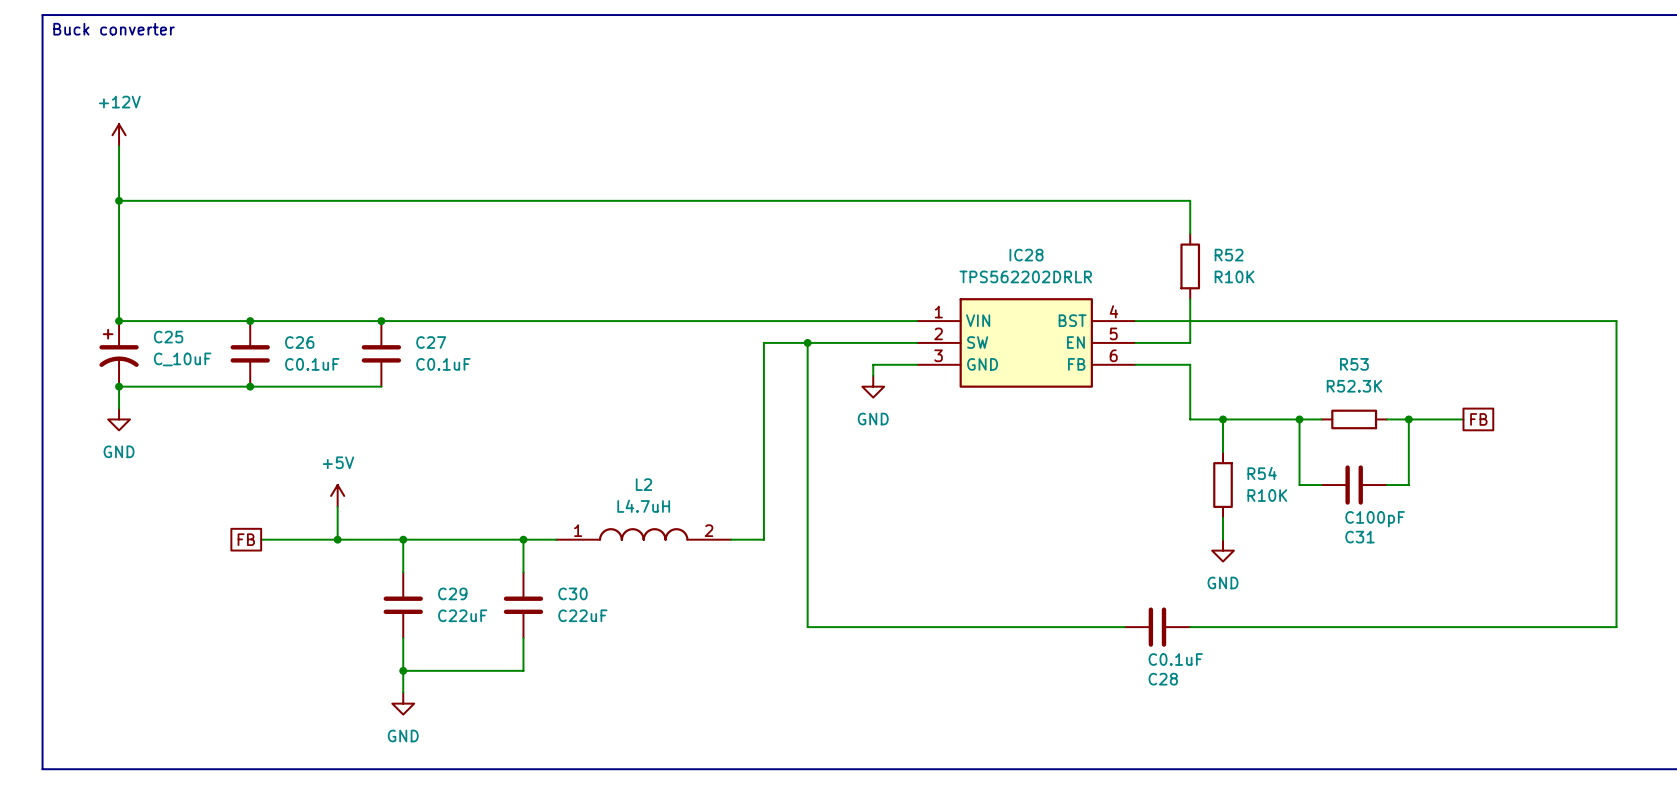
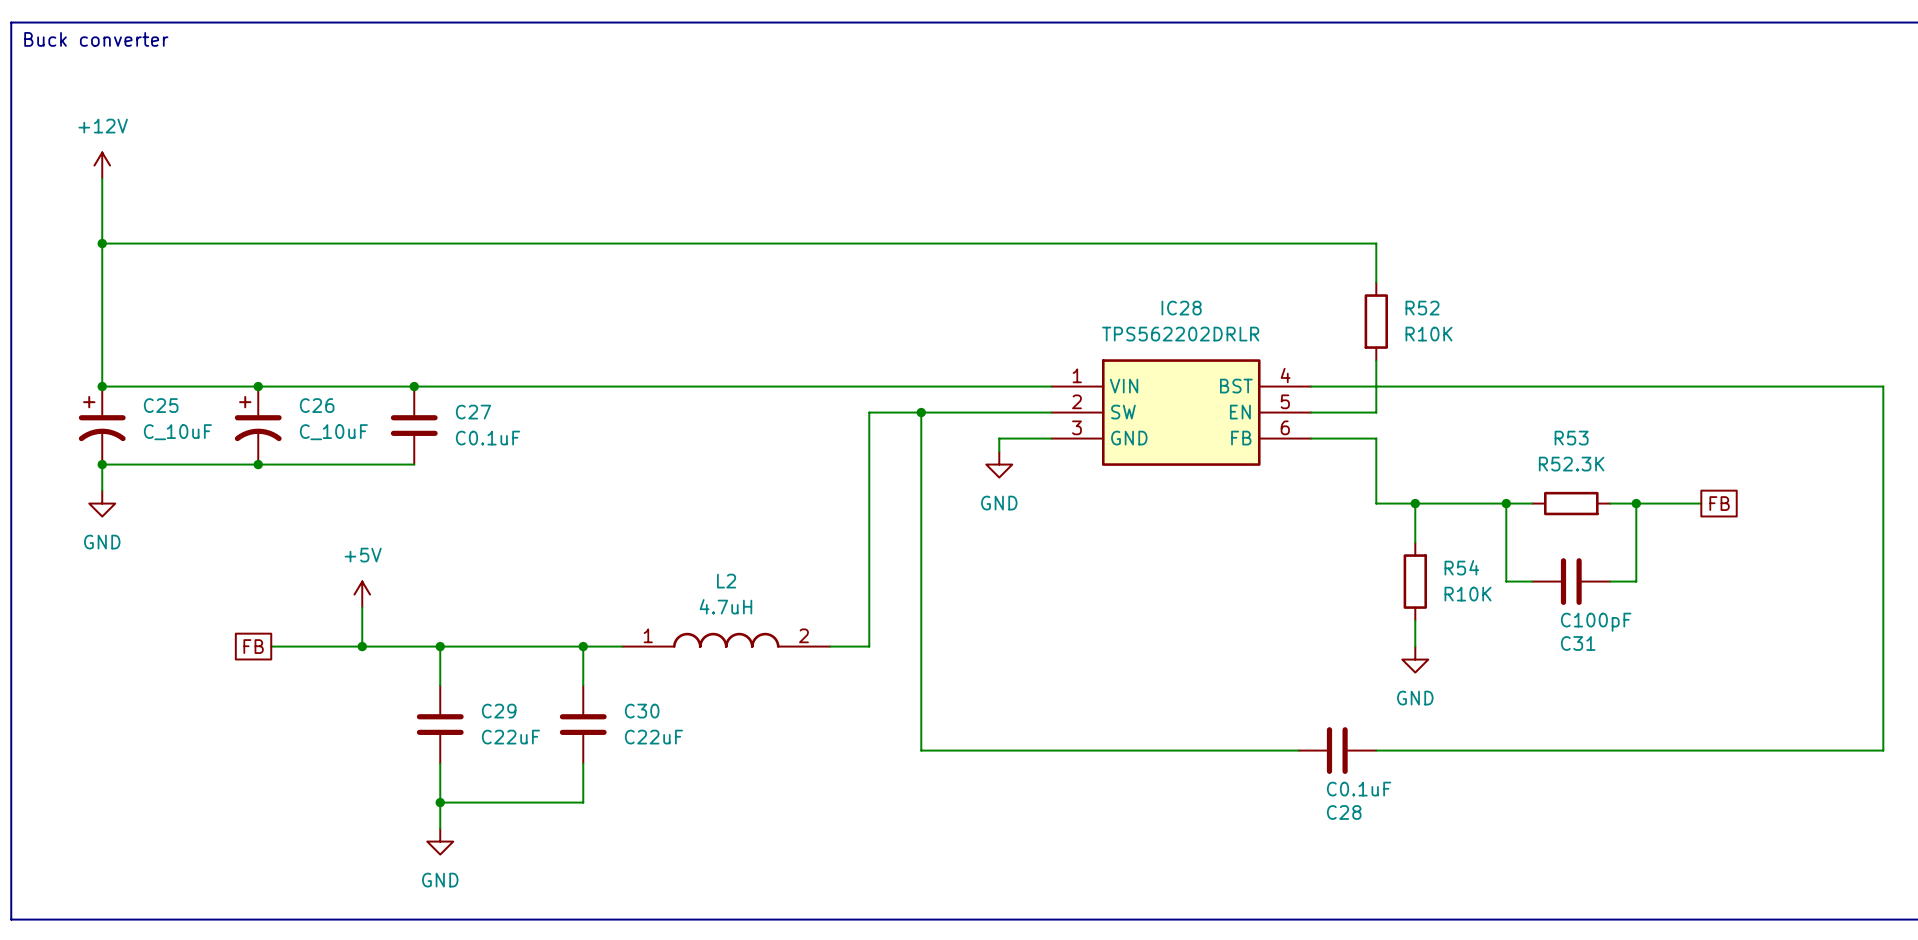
C26 symbol: [230, 321, 270, 387] -> [234, 386, 282, 465]
C26 value: C0.1uF (312, 364) -> C_10uF (333, 432)
L2 value: L4.7uH (643, 506) -> 4.7uH (725, 606)

